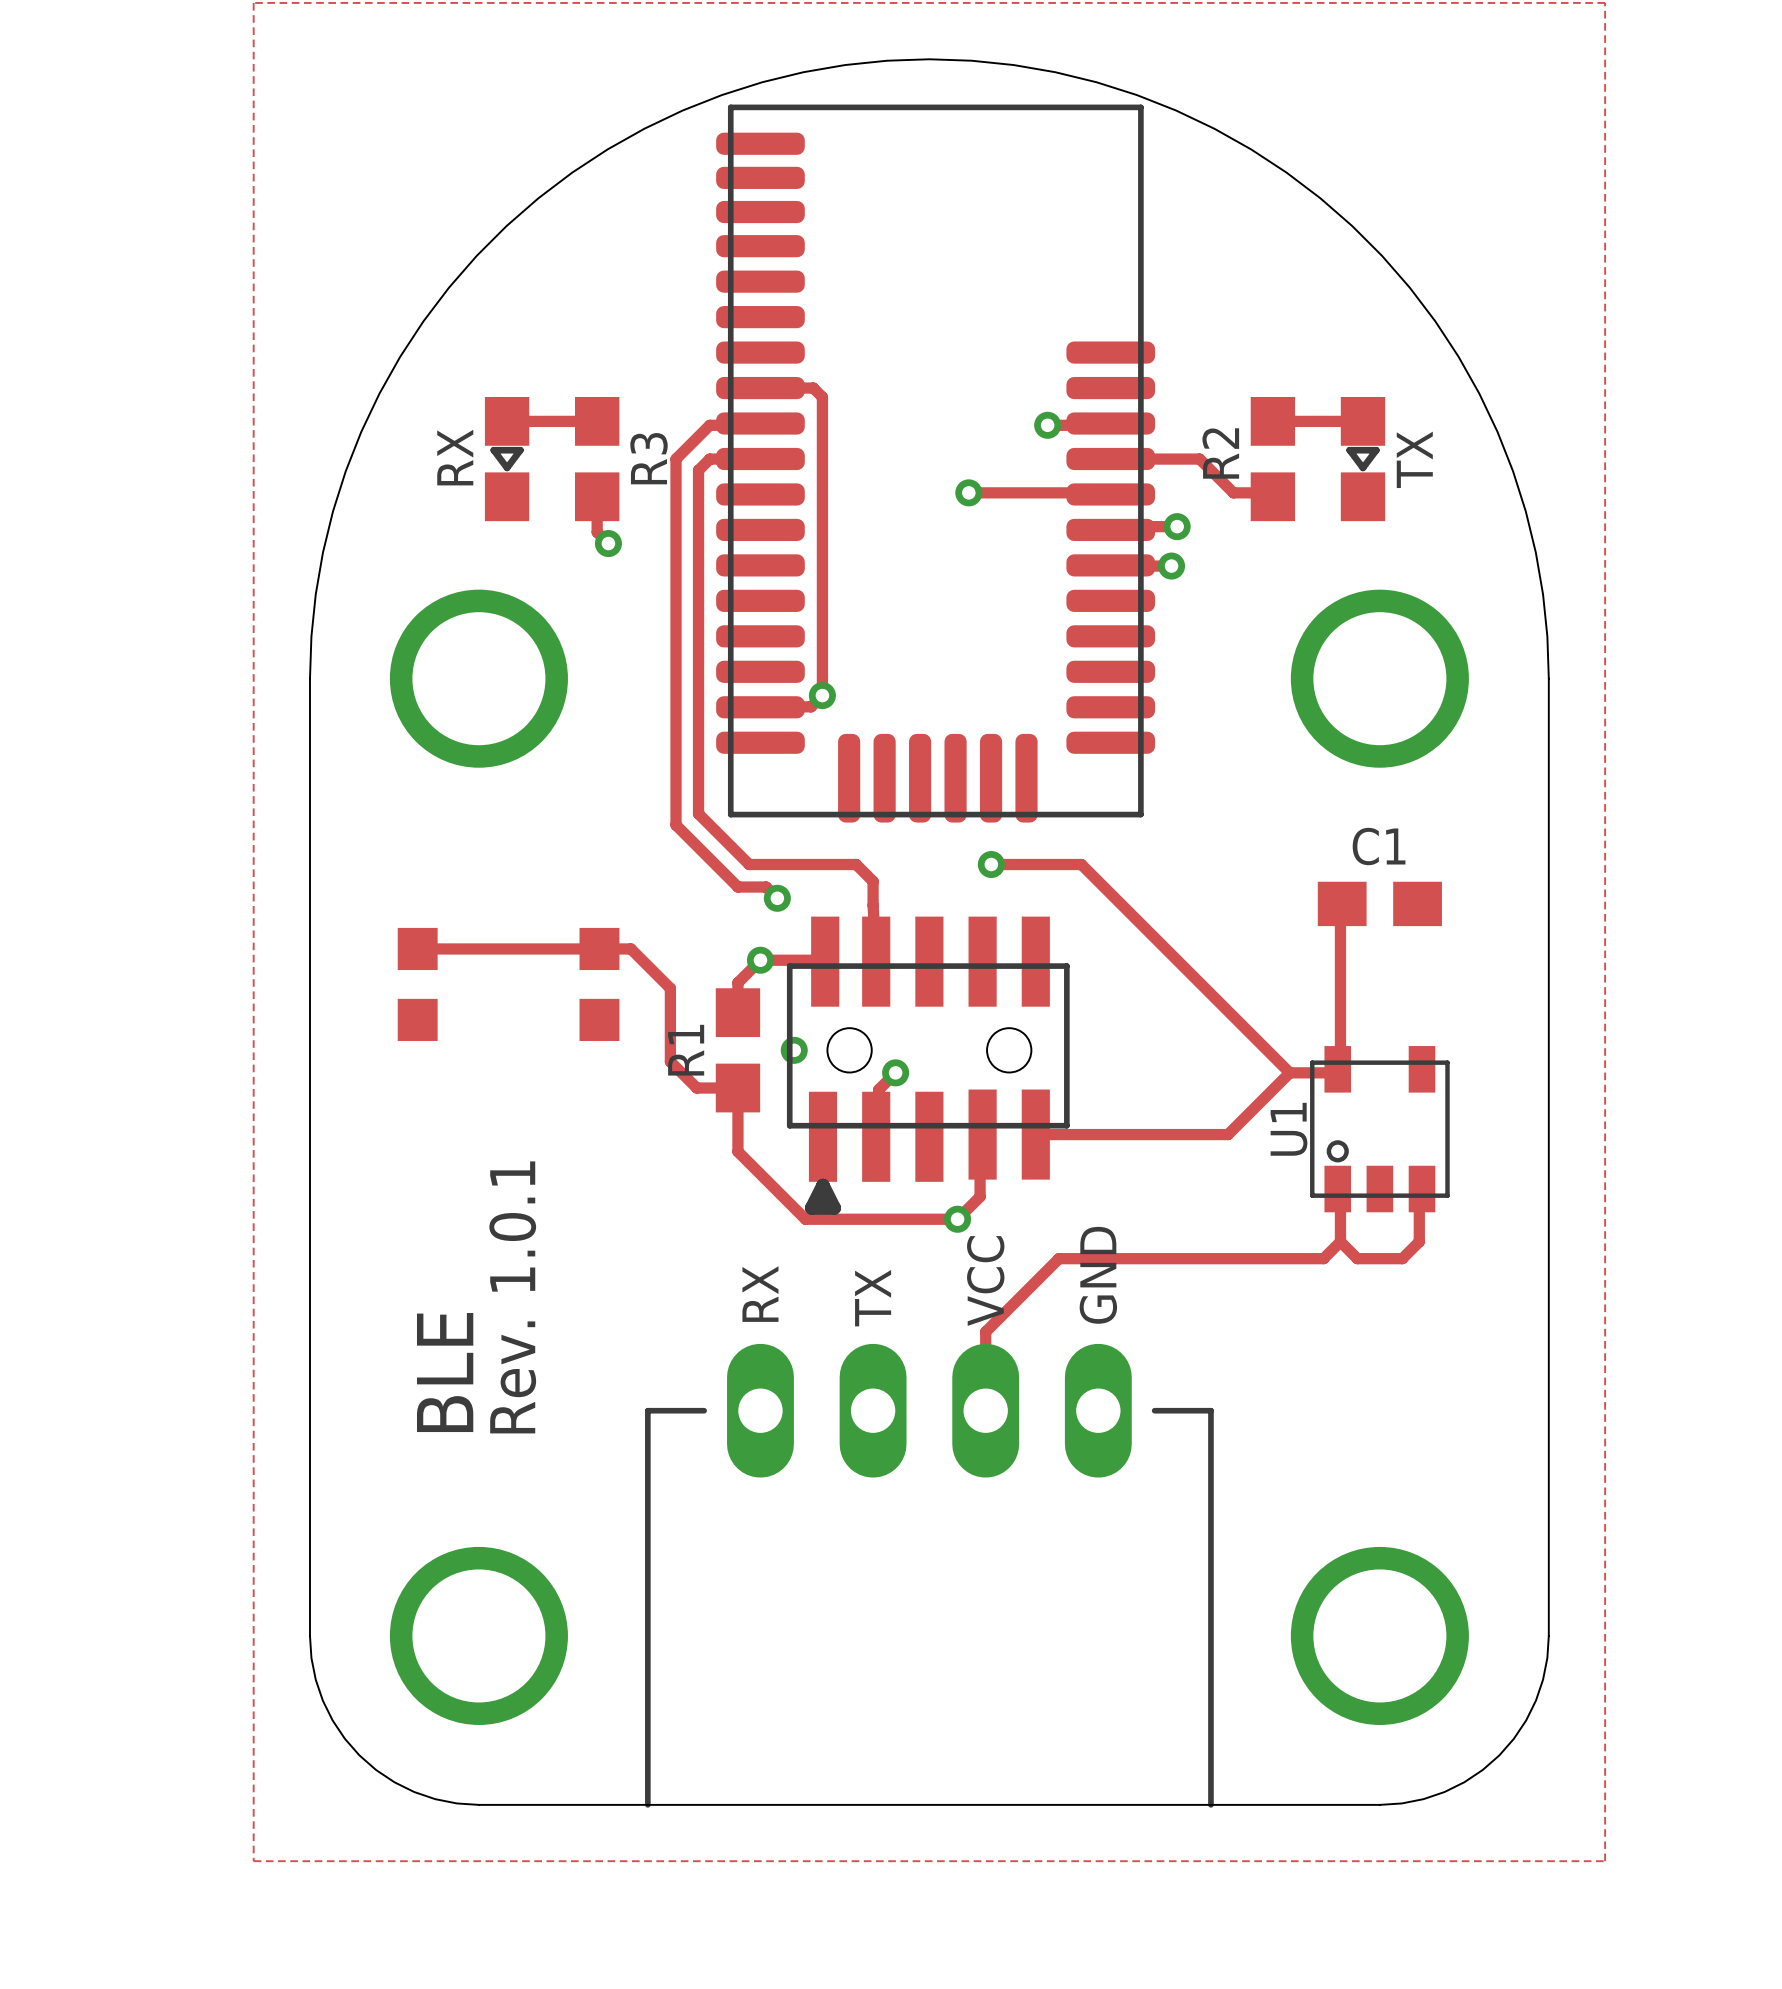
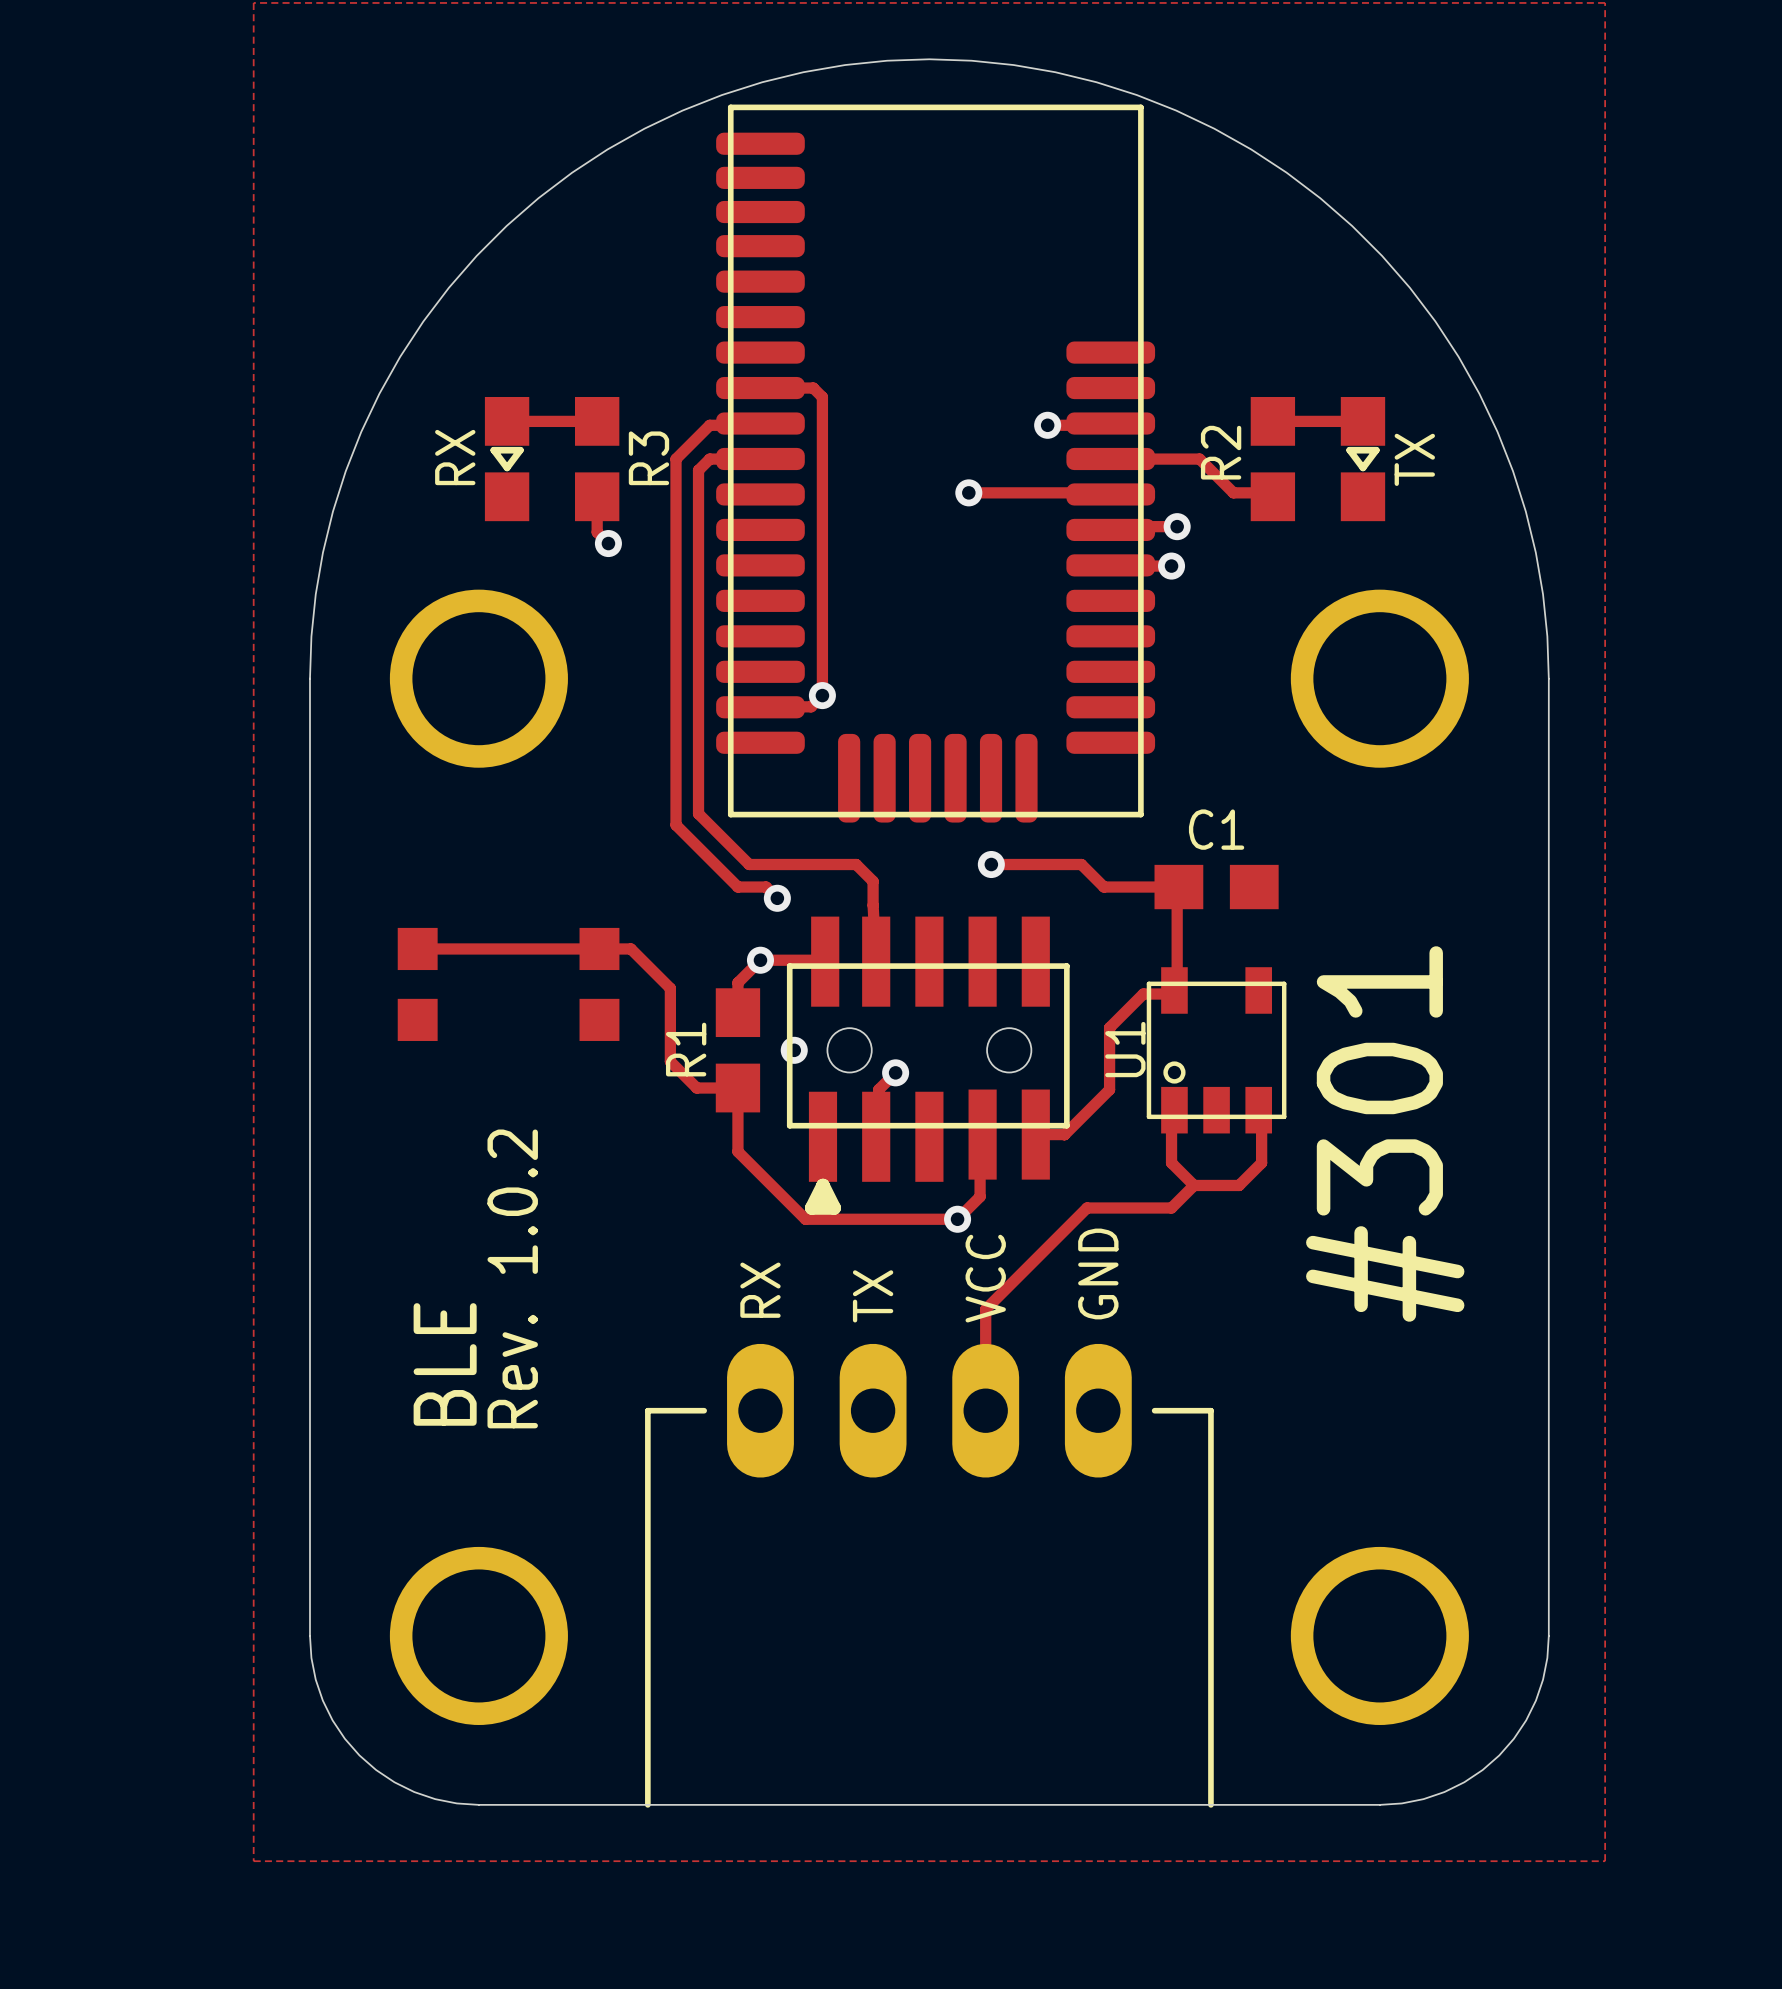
track: (1103, 887) (1289, 1072) -> (1103, 887) (1178, 887)
track: (1342, 903) (1340, 905) (1340, 1050) (1337, 1053) (1337, 1069) (1334, 1072) (1289, 1072) -> none
C1 position: (1379, 903) -> (1216, 887)
track: (1289, 1072) (1228, 1134) (1064, 1134) -> (1177, 887) (1177, 990) (1170, 994) (1143, 994) (1109, 1027) (1109, 1089) (1064, 1134)
track: none -> (1174, 1110) (1171, 1113) (1171, 1162) (1194, 1185)
track: none -> (1258, 1110) (1258, 1120) (1261, 1123) (1261, 1162) (1239, 1185) (1194, 1185)
U1 position: (1379, 1129) -> (1216, 1050)
text: none -> #301 (1385, 1133)
track: (1337, 1189) (1340, 1191) (1340, 1241) -> none
track: (1422, 1189) (1422, 1205) (1419, 1208) (1419, 1241) (1402, 1258) (1357, 1258) (1340, 1241) -> none
track: (1340, 1241) (1323, 1258) (1058, 1258) (985, 1331) -> (1194, 1185) (1171, 1208) (1087, 1208) (985, 1309) (985, 1331)
text: Rev. 1.0.1 (512, 1297) -> Rev. 1.0.2 (512, 1278)

